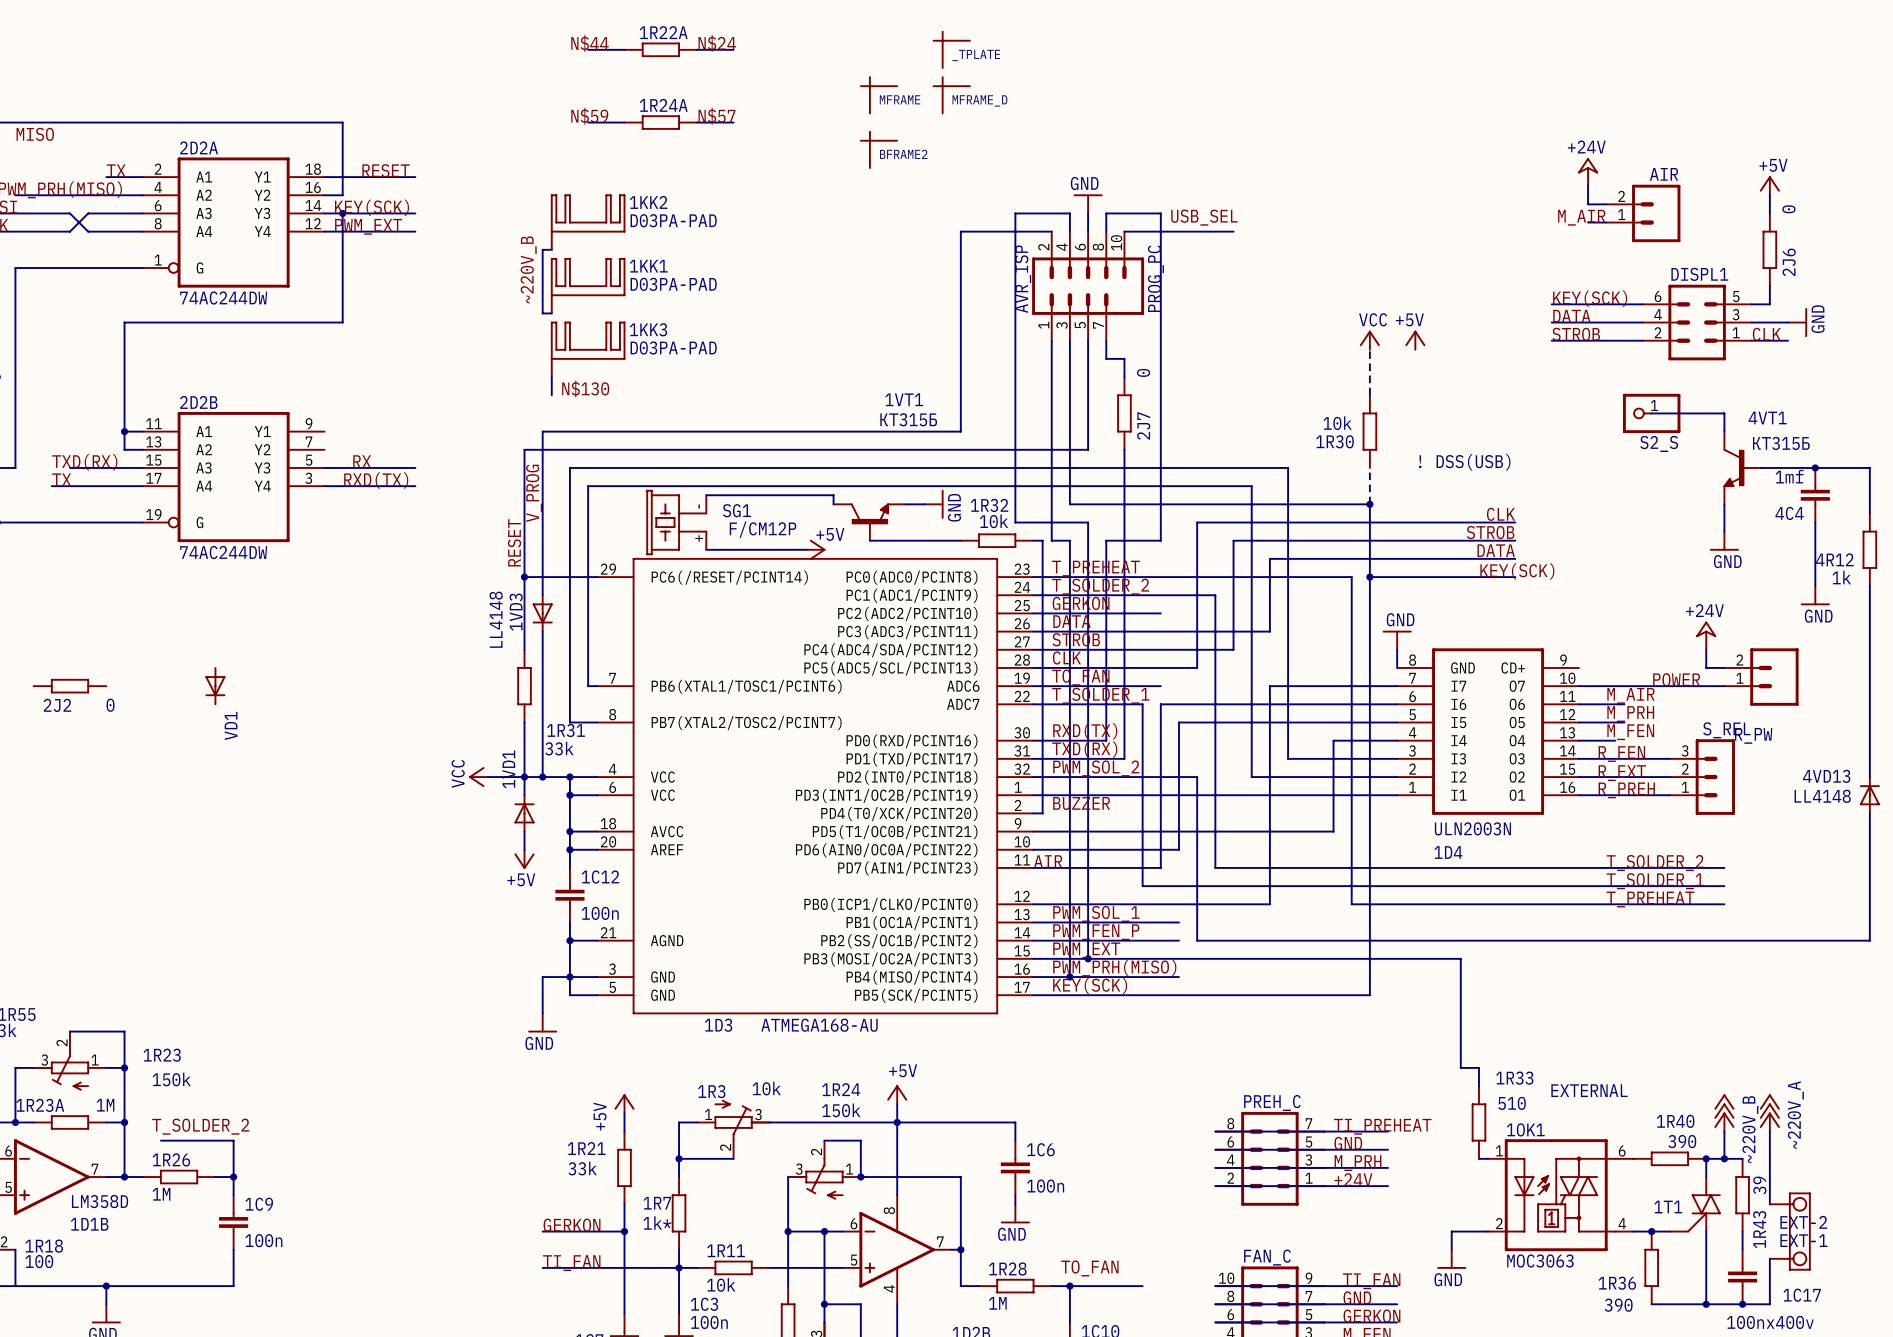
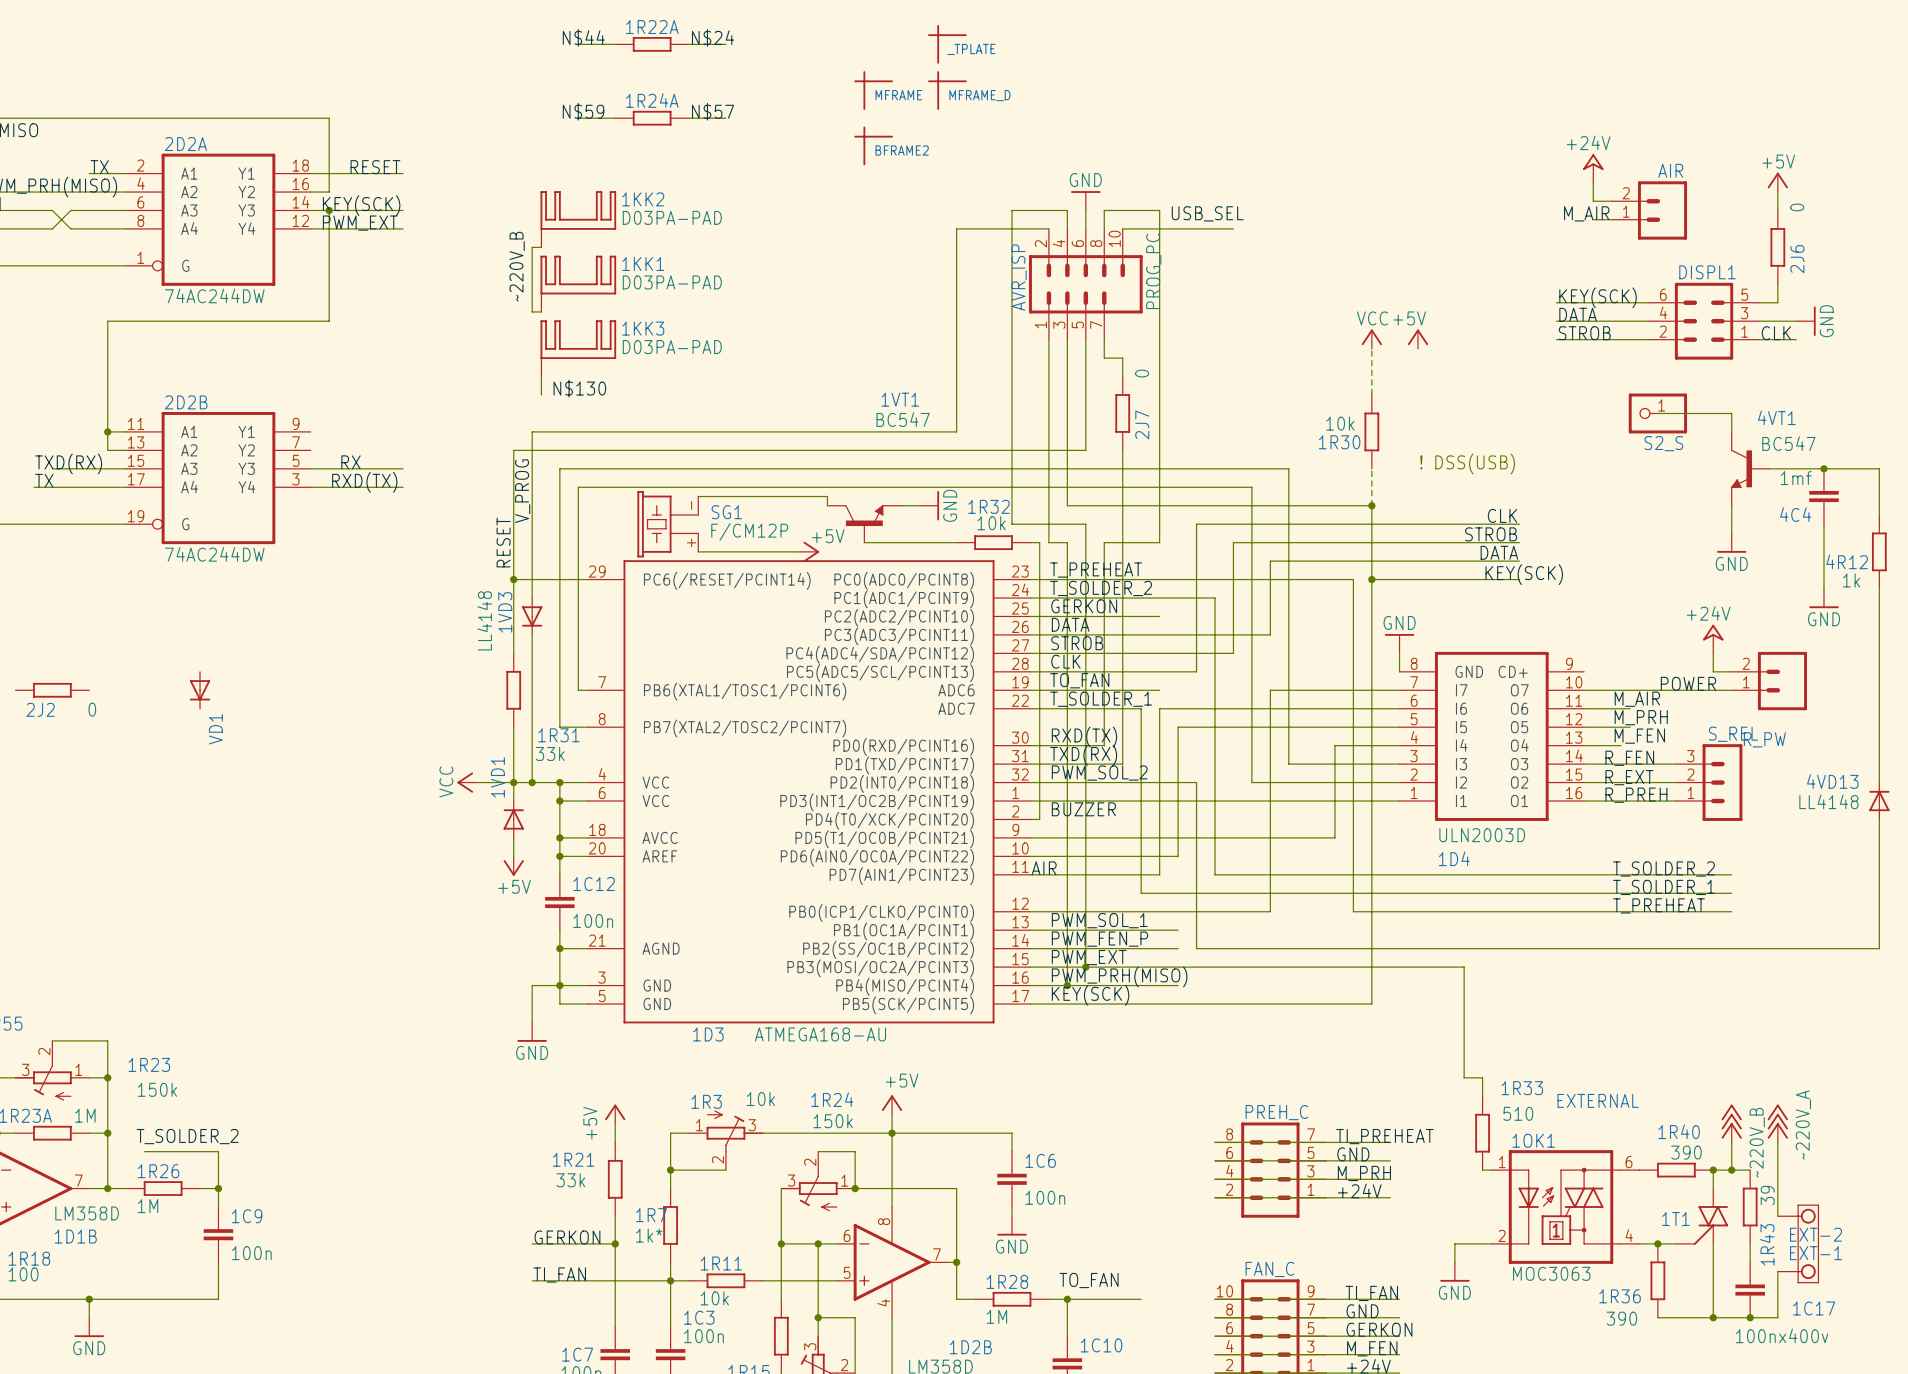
1VT1 value: КТ315Б (908, 419) -> BC547 (903, 419)
4VT1 value: КТ315Б (1781, 443) -> BC547 (1788, 443)
1D4 value: ULN2003N (1472, 828) -> ULN2003D (1482, 835)

